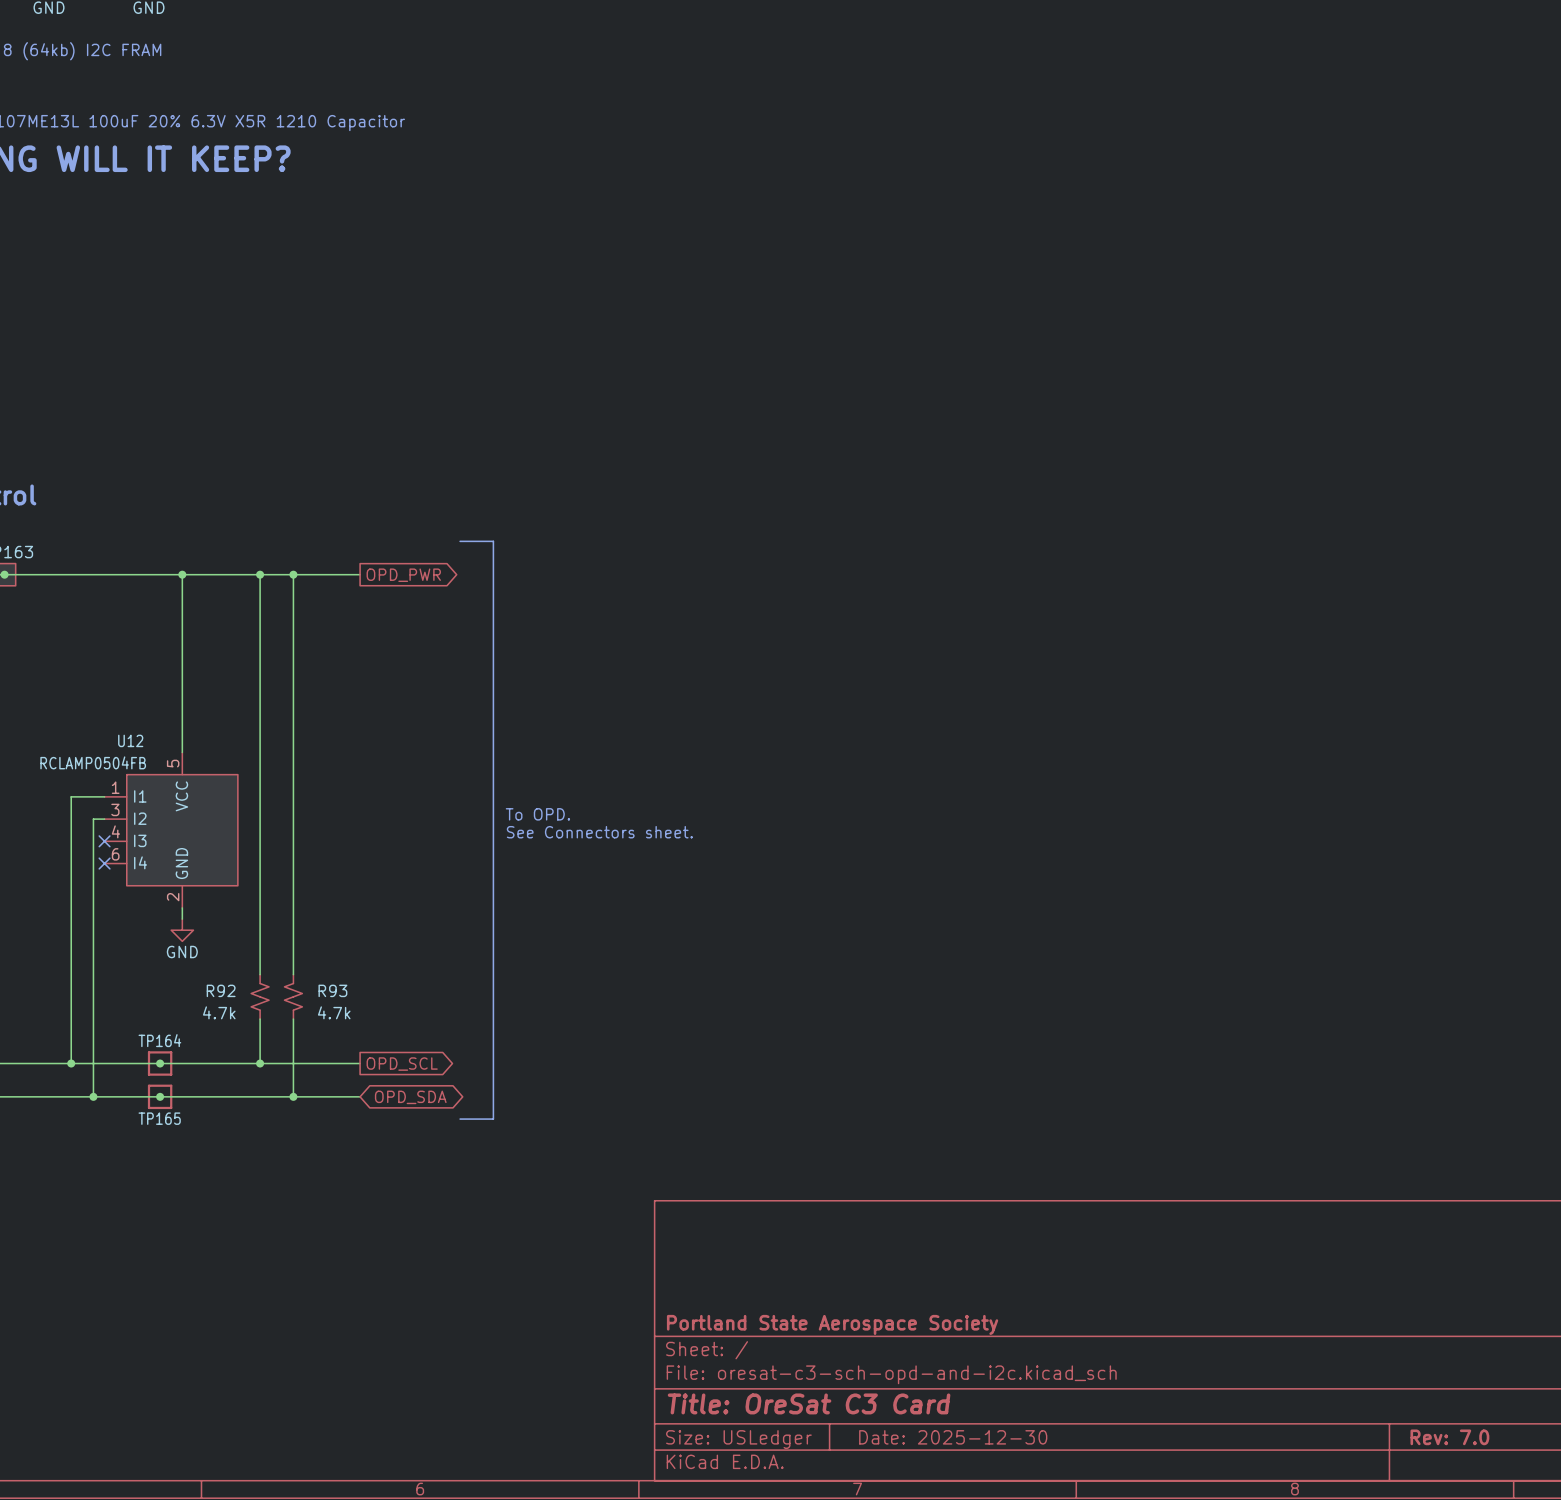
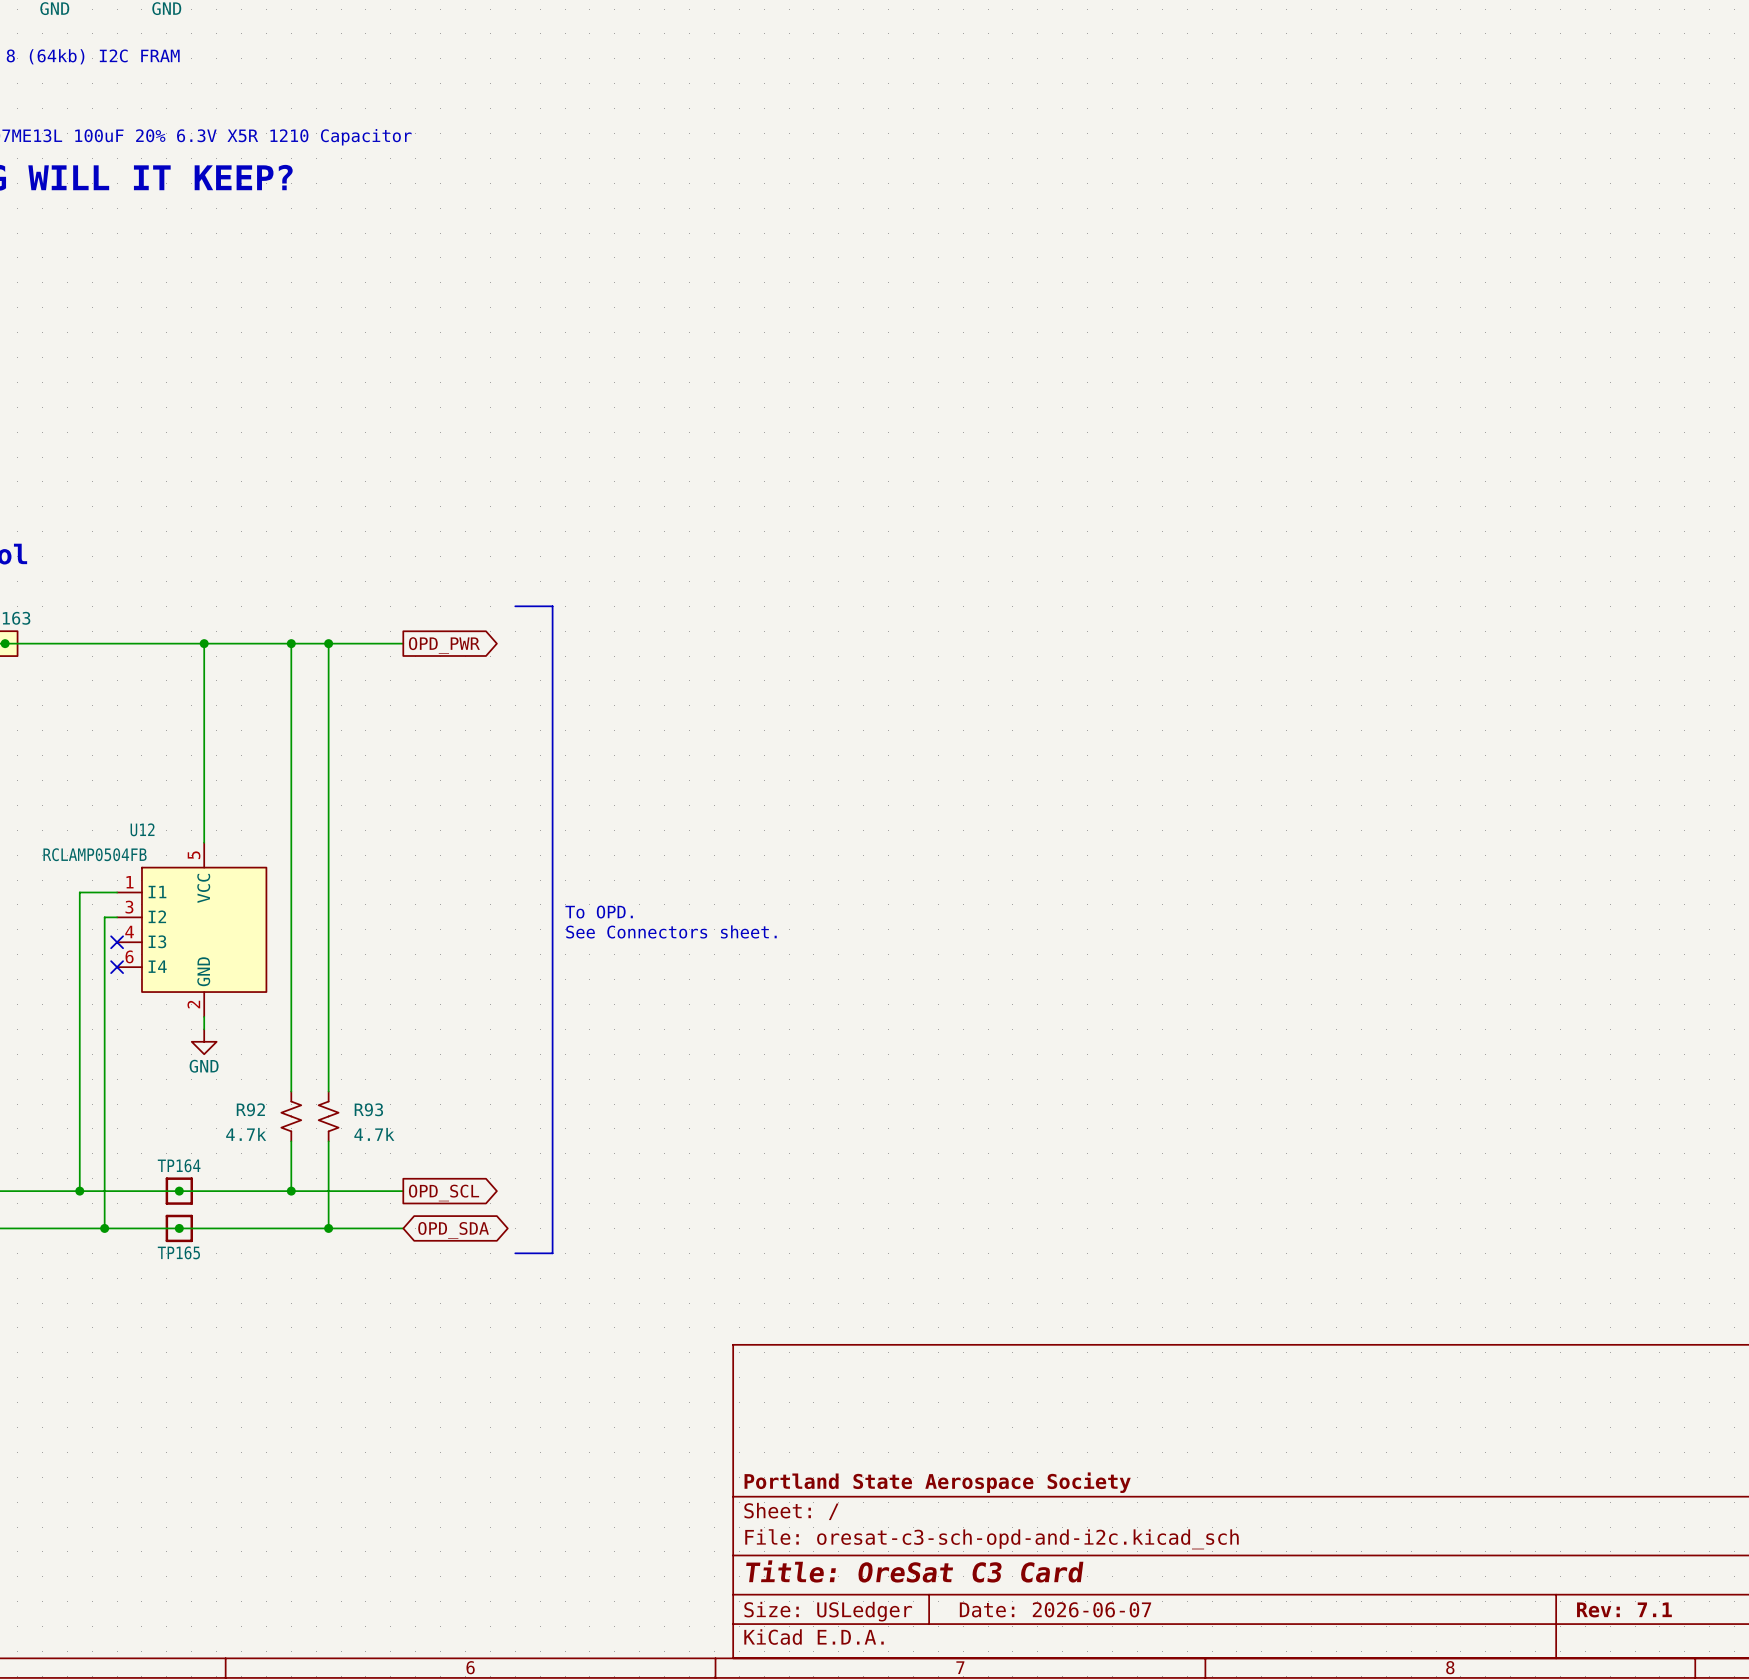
title block: Date: 2025-12-30 (953, 1437) -> Date: 2026-06-07 (1055, 1609)
title block: Rev: 7.0 (1449, 1437) -> Rev: 7.1 (1624, 1609)

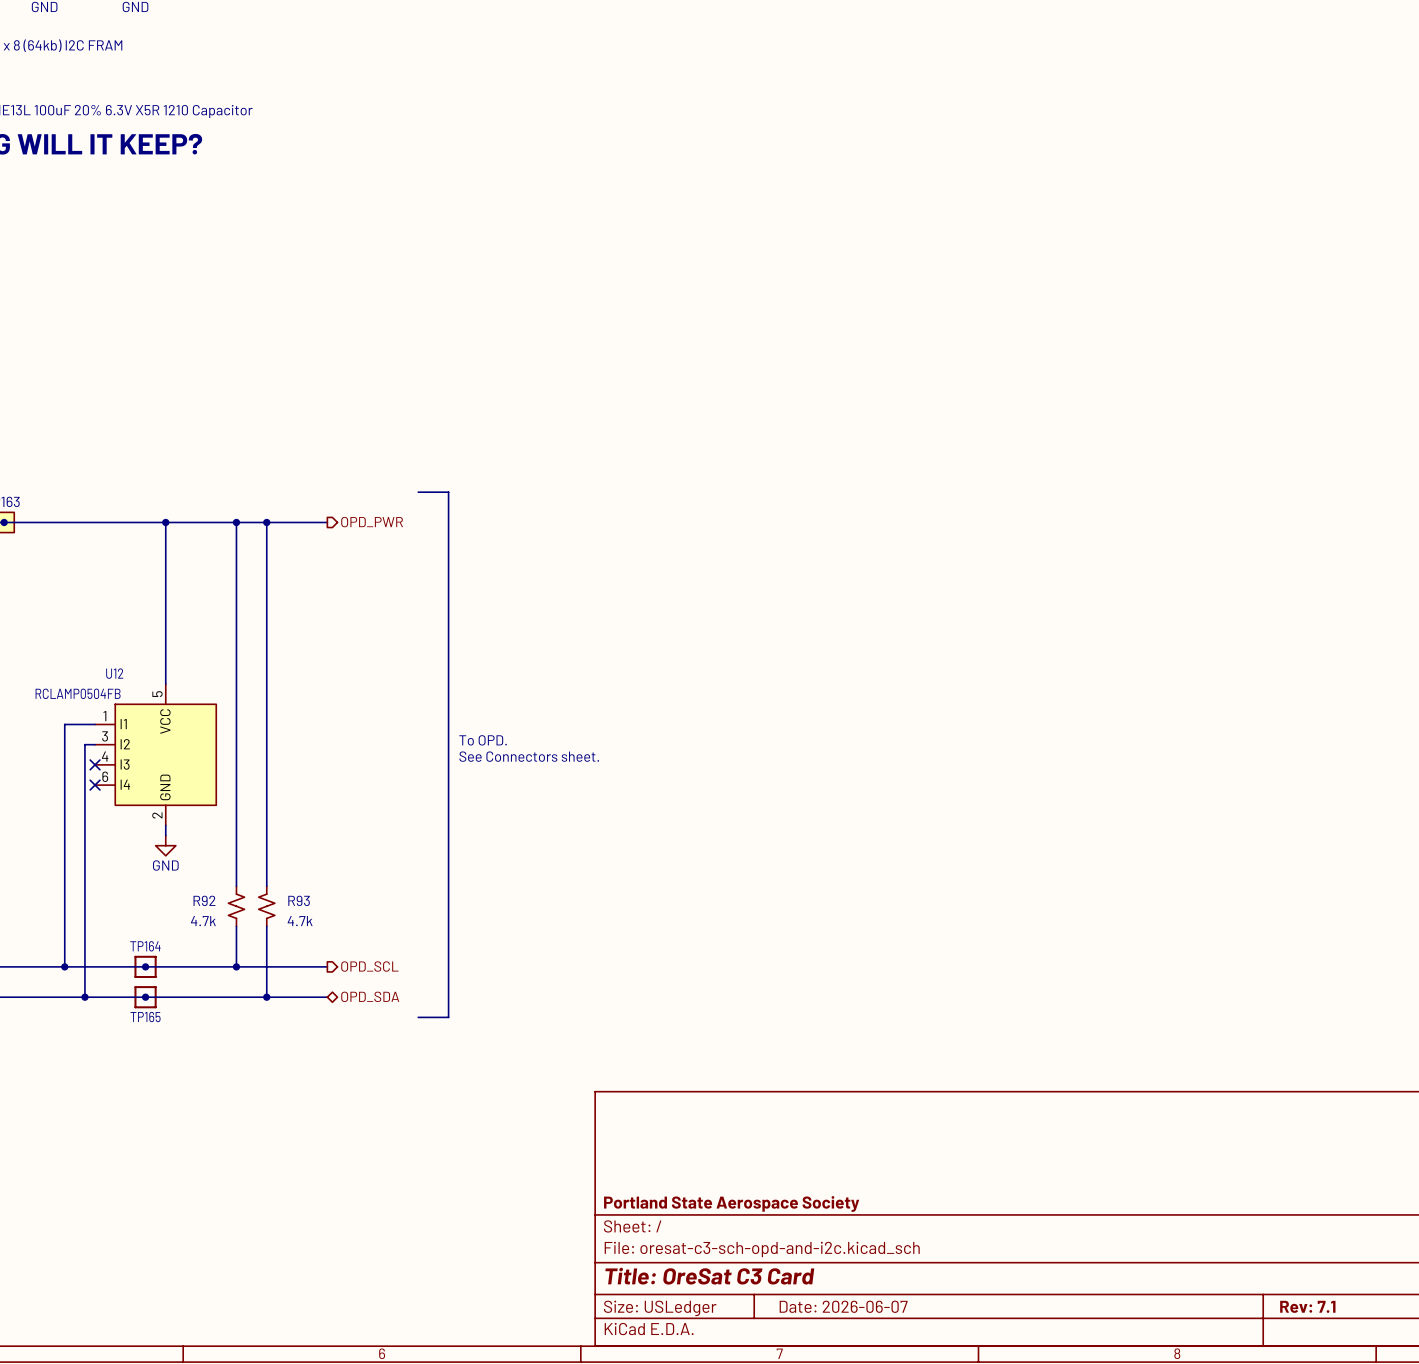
global label: OPD_PWR (444, 645) -> none
hierarchical label: none -> OPD_PWR (372, 522)
hierarchical label: none -> OPD_SCL (369, 966)
global label: OPD_SCL (444, 1193) -> none
hierarchical label: none -> OPD_SDA (370, 996)
global label: OPD_SDA (453, 1230) -> none

